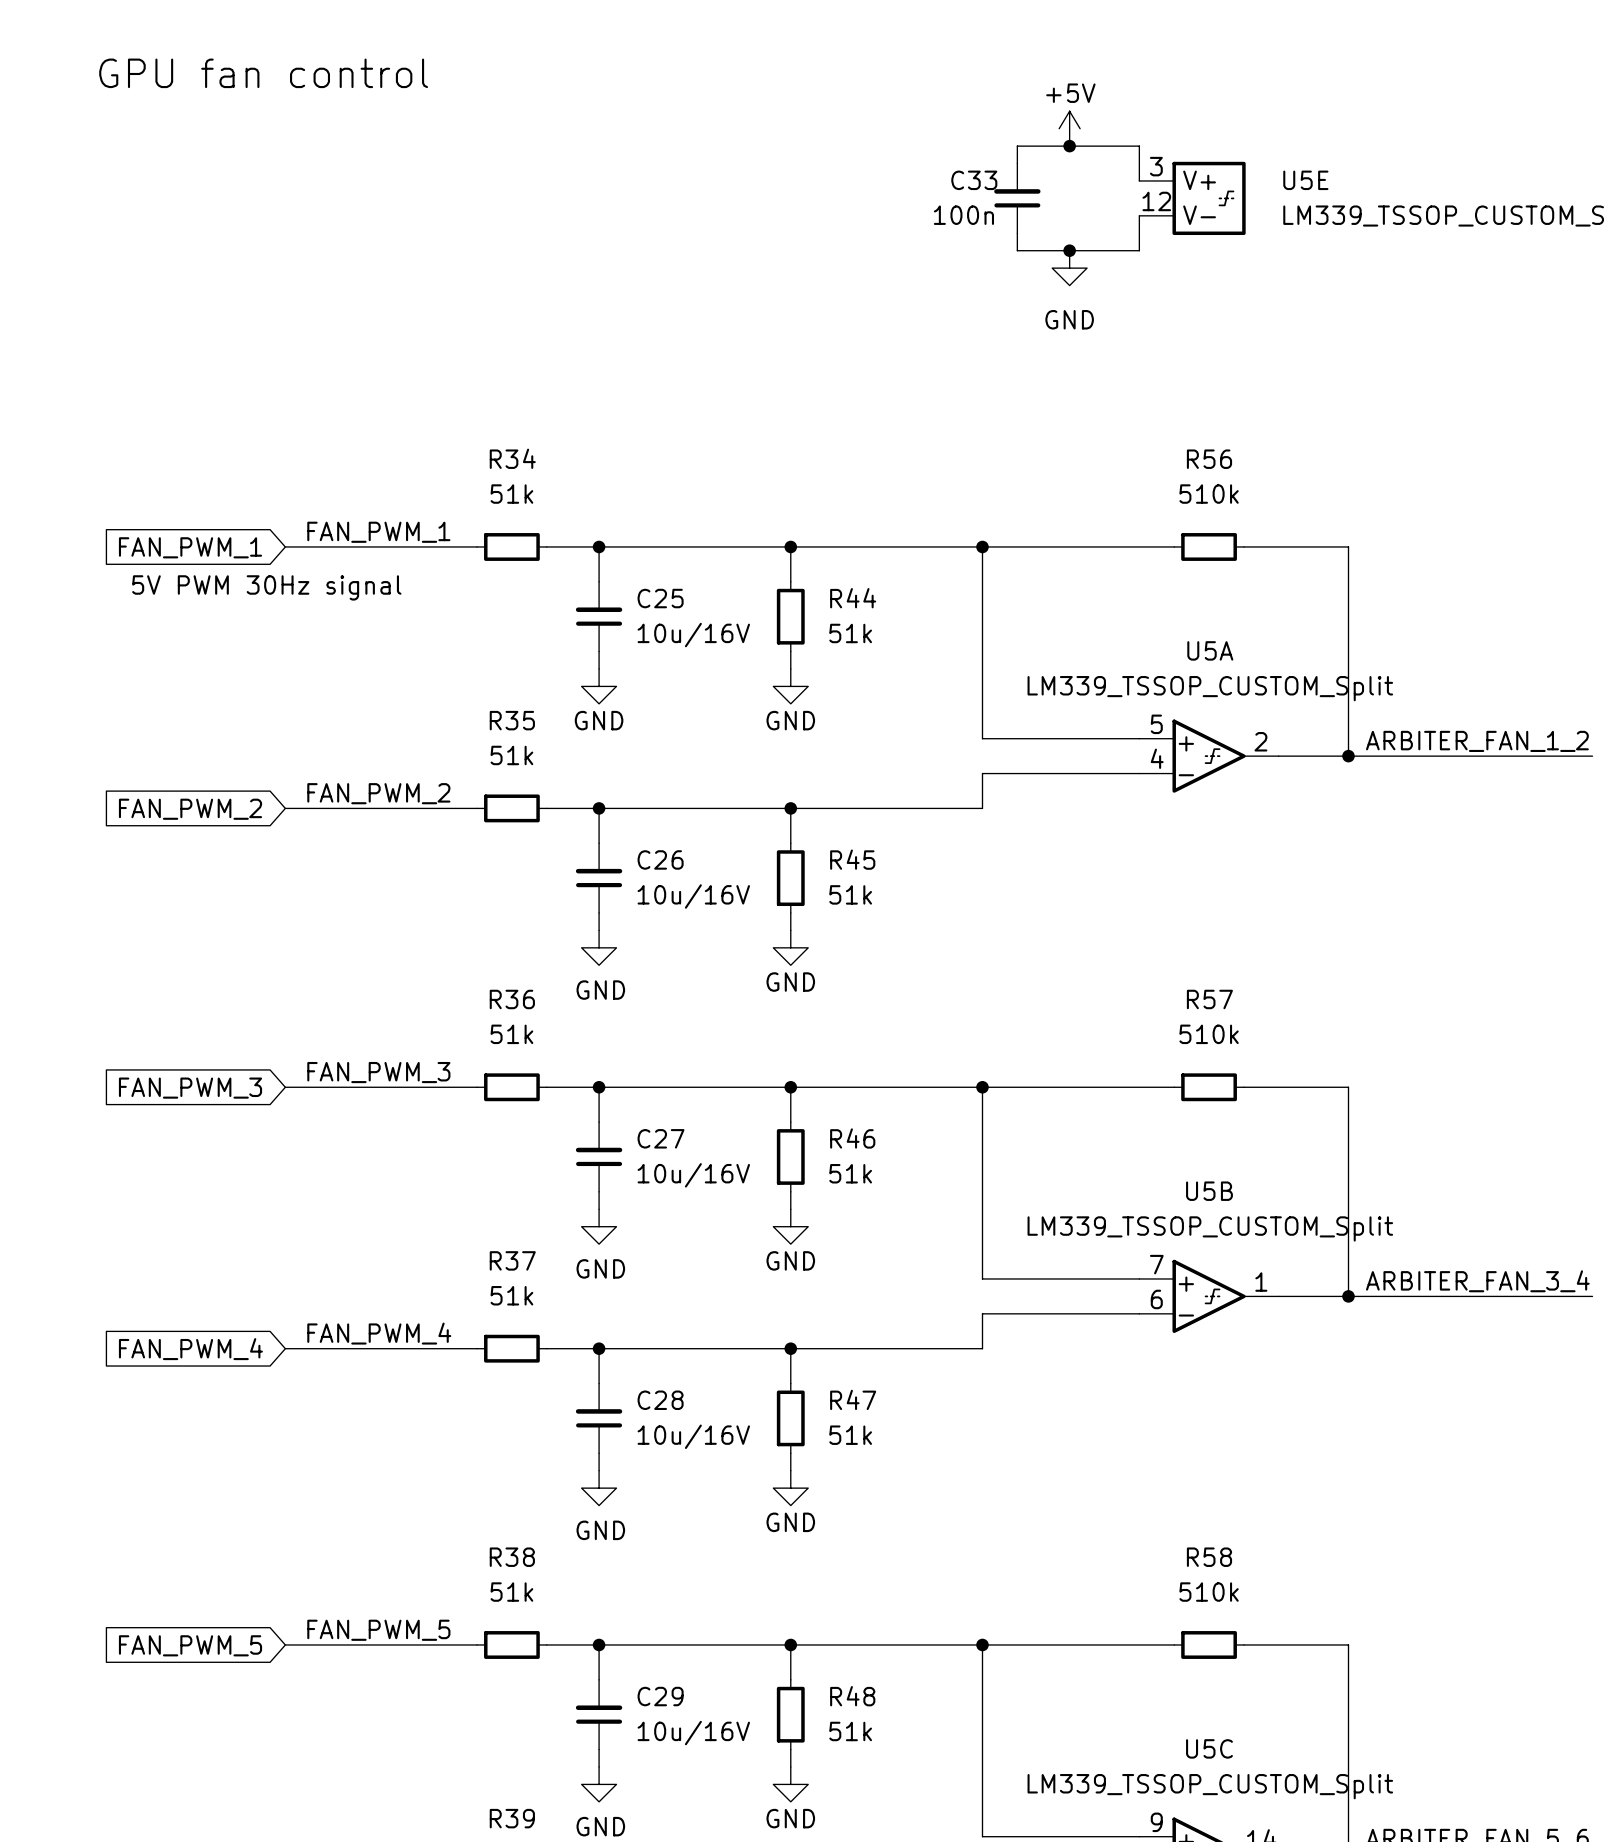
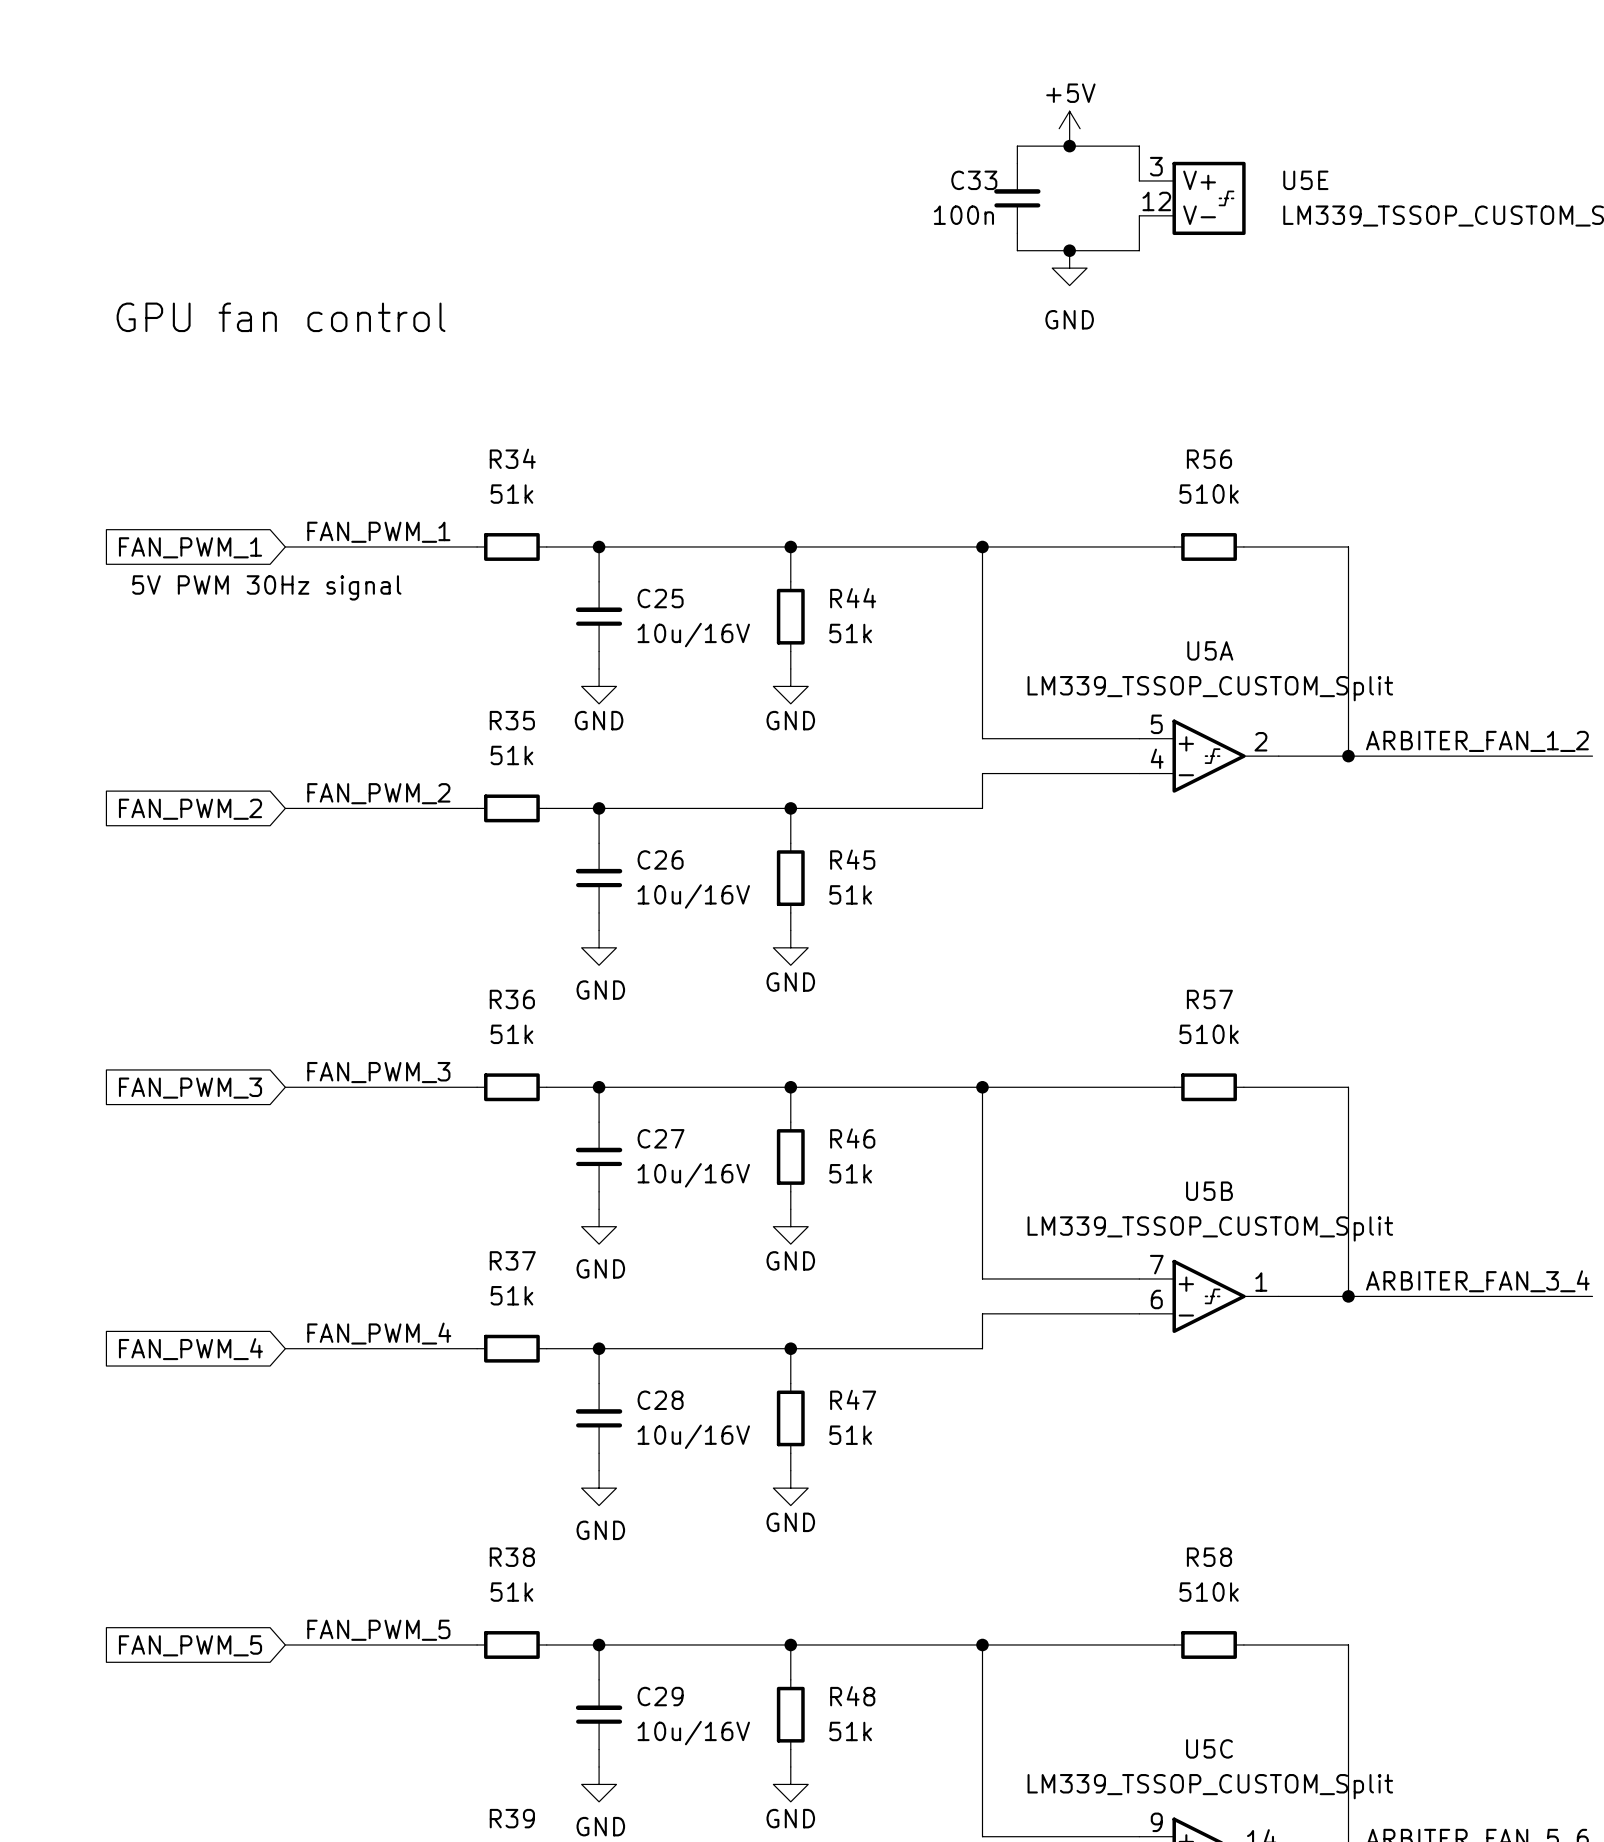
text position: GPU fan control (263, 73) -> GPU fan control (281, 317)

